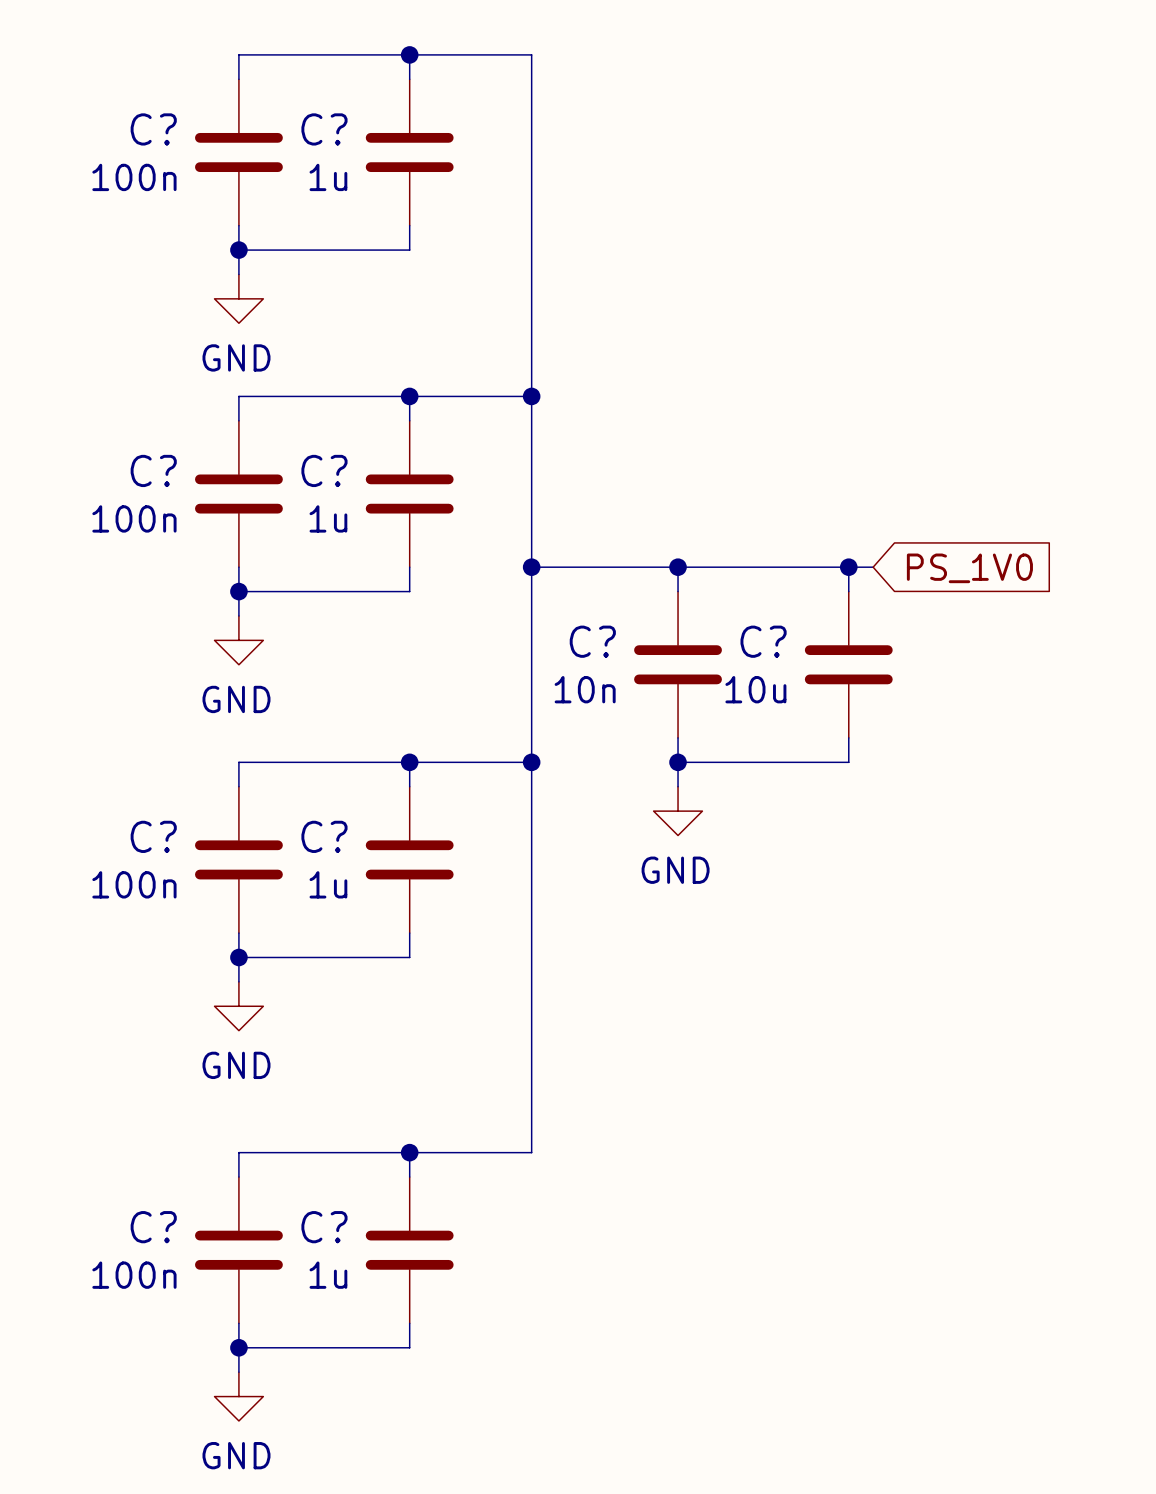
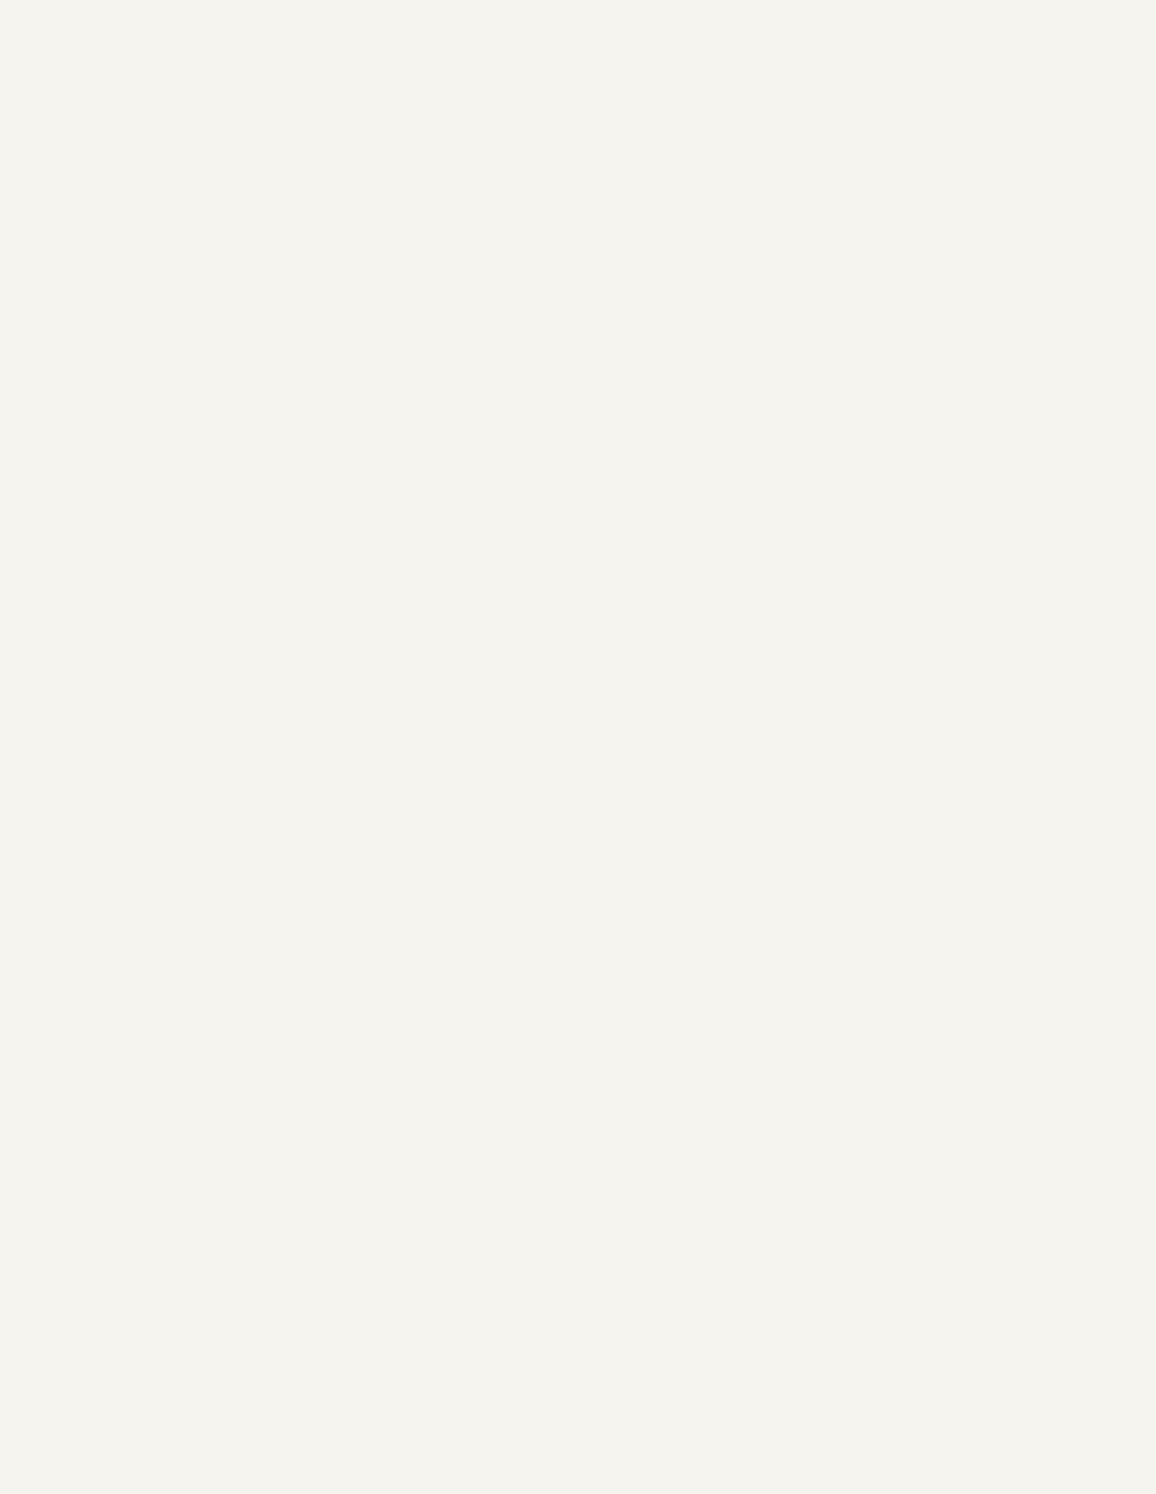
wire: (409, 54) (409, 79) -> none
junction: (409, 54) -> none
wire: (238, 79) (238, 54) (531, 54) (531, 1152) (238, 1152) (238, 1177) -> none
C?: (238, 152) -> none
C?: (409, 152) -> none
wire: (238, 225) (238, 274) -> none
wire: (409, 225) (409, 250) (238, 250) -> none
junction: (238, 250) -> none
power symbol: GND (238, 298) -> none
wire: (409, 396) (409, 420) -> none
junction: (409, 396) -> none
wire: (531, 396) (238, 396) (238, 420) -> none
junction: (531, 396) -> none
C?: (238, 494) -> none
C?: (409, 494) -> none
wire: (238, 567) (238, 615) -> none
wire: (409, 567) (409, 591) (238, 591) -> none
wire: (531, 567) (873, 567) -> none
junction: (531, 567) -> none
wire: (678, 567) (678, 591) -> none
junction: (678, 567) -> none
wire: (848, 567) (848, 591) -> none
junction: (848, 567) -> none
global label: PS_1V0 (969, 568) -> none
junction: (238, 591) -> none
power symbol: GND (238, 640) -> none
C?: (678, 664) -> none
C?: (848, 664) -> none
wire: (678, 737) (678, 786) -> none
wire: (848, 737) (848, 762) (678, 762) -> none
wire: (409, 762) (409, 786) -> none
junction: (409, 762) -> none
wire: (531, 762) (238, 762) (238, 786) -> none
junction: (531, 762) -> none
junction: (678, 762) -> none
power symbol: GND (678, 811) -> none
C?: (238, 859) -> none
C?: (409, 859) -> none
wire: (238, 933) (238, 981) -> none
wire: (409, 933) (409, 957) (238, 957) -> none
junction: (238, 957) -> none
power symbol: GND (238, 1006) -> none
wire: (409, 1152) (409, 1177) -> none
junction: (409, 1152) -> none
C?: (238, 1250) -> none
C?: (409, 1250) -> none
wire: (238, 1323) (238, 1372) -> none
wire: (409, 1323) (409, 1347) (238, 1347) -> none
junction: (238, 1347) -> none
power symbol: GND (238, 1396) -> none

